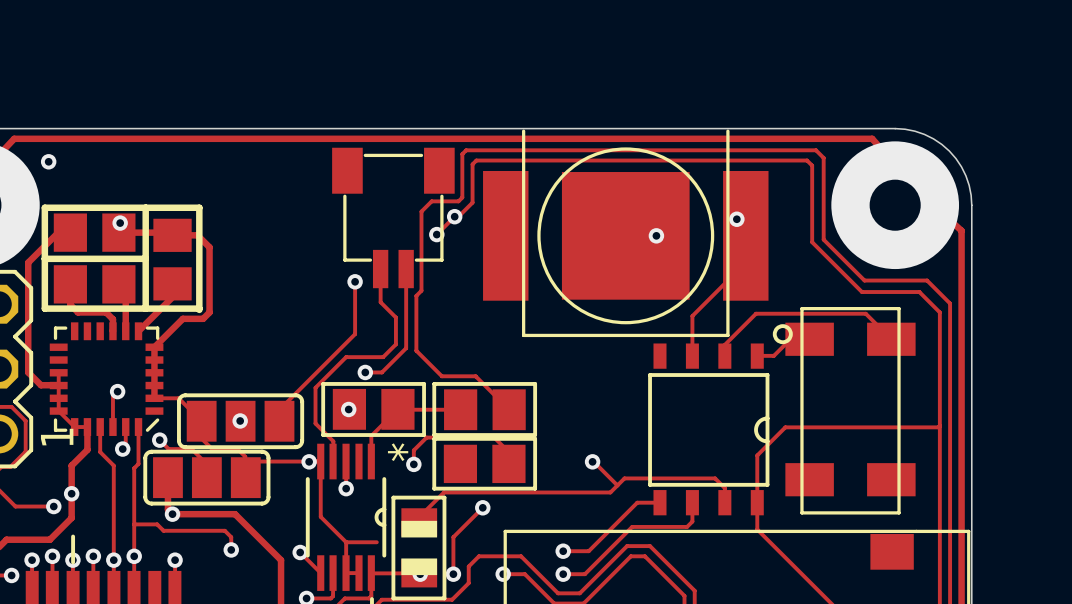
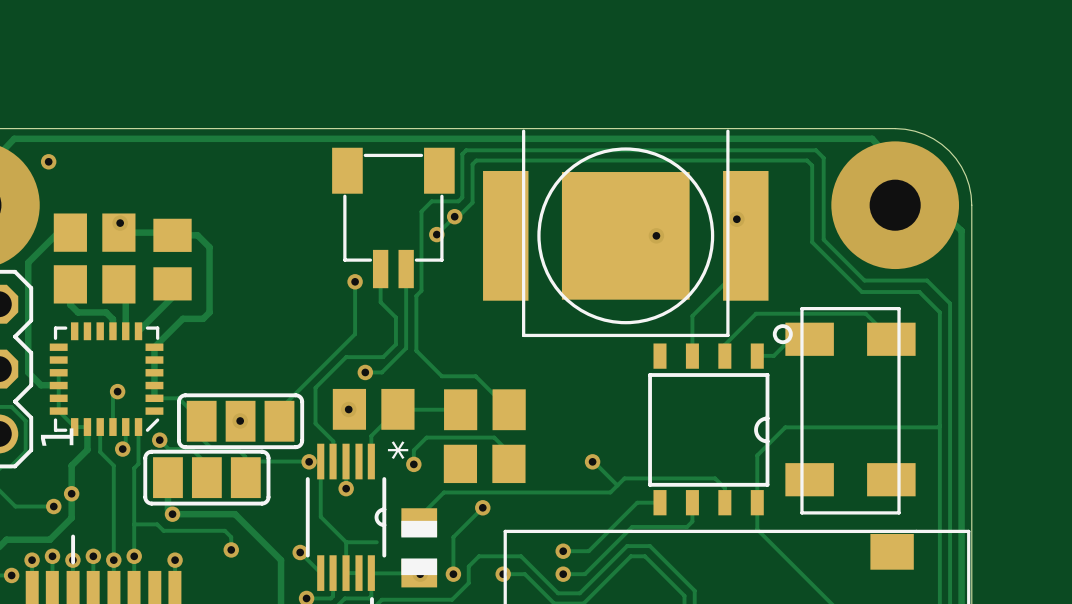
line: (145, 207) (145, 308) -> none
line: (44, 258) (145, 258) -> none
line: (199, 308) (44, 308) (44, 207) (199, 207) (199, 309) -> none
line: (323, 383) (424, 383) (424, 435) (323, 435) (323, 383) -> none
line: (434, 383) (535, 383) (535, 435) (434, 435) (434, 383) -> none
line: (434, 438) (434, 488) (535, 488) (535, 438) (434, 438) -> none
line: (393, 497) (444, 497) (444, 598) (393, 598) (393, 497) -> none

